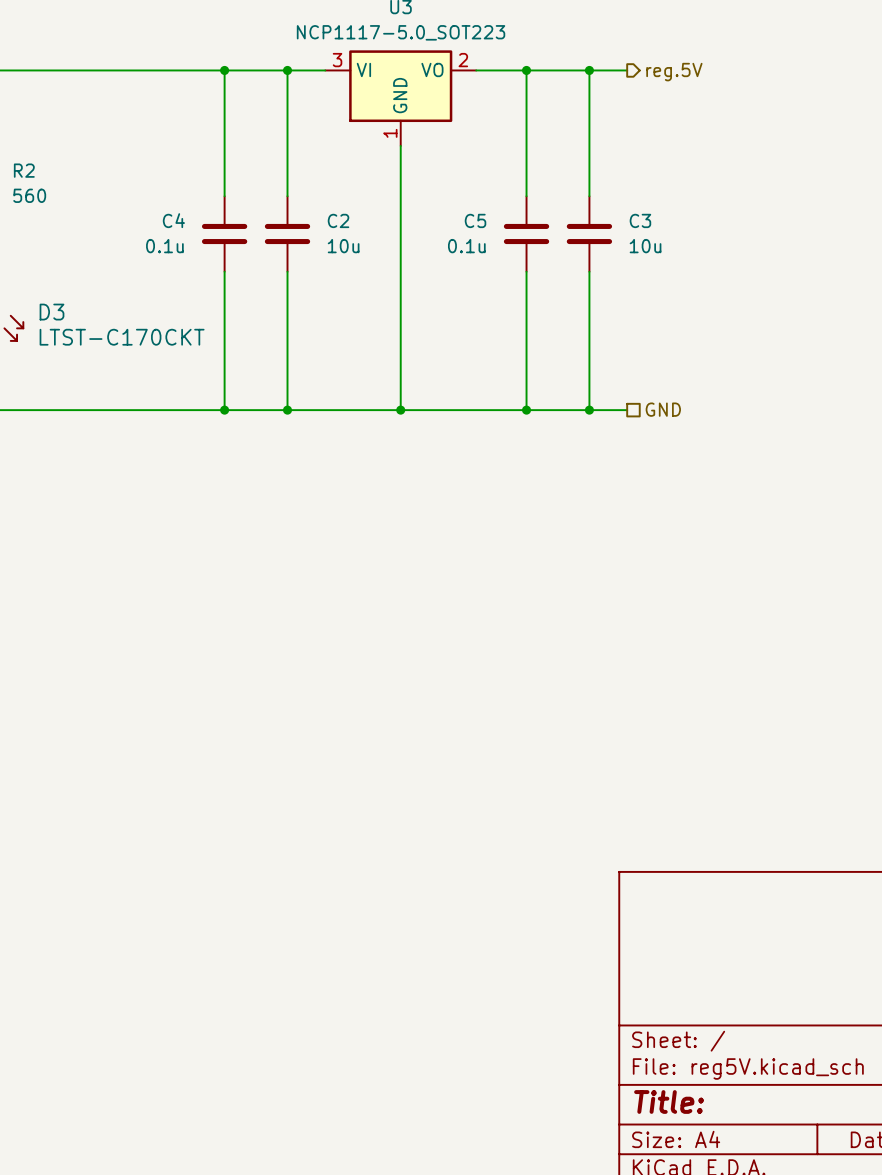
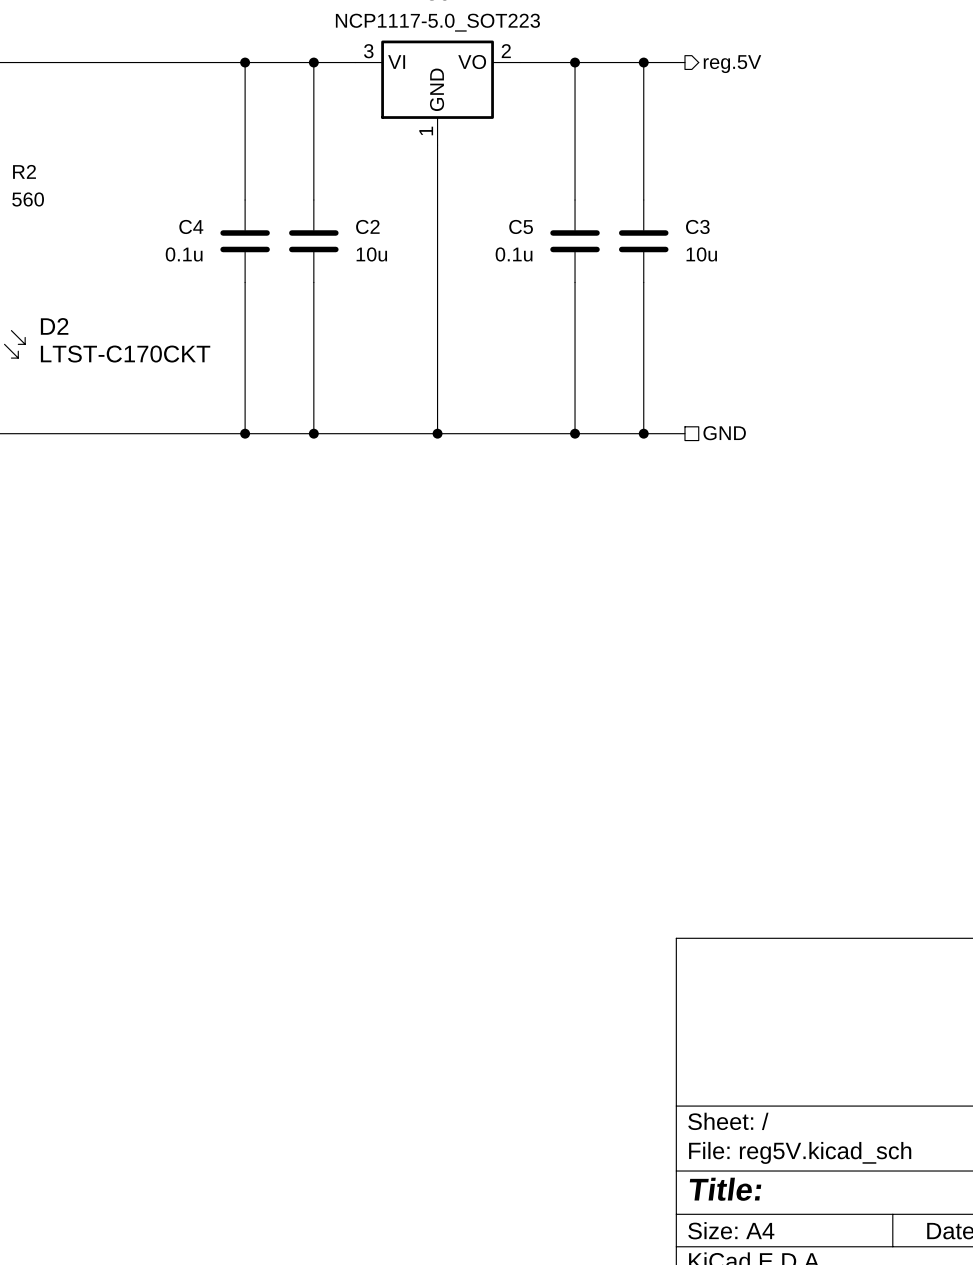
D3 name: D3 (51, 312) -> D2 (54, 326)

